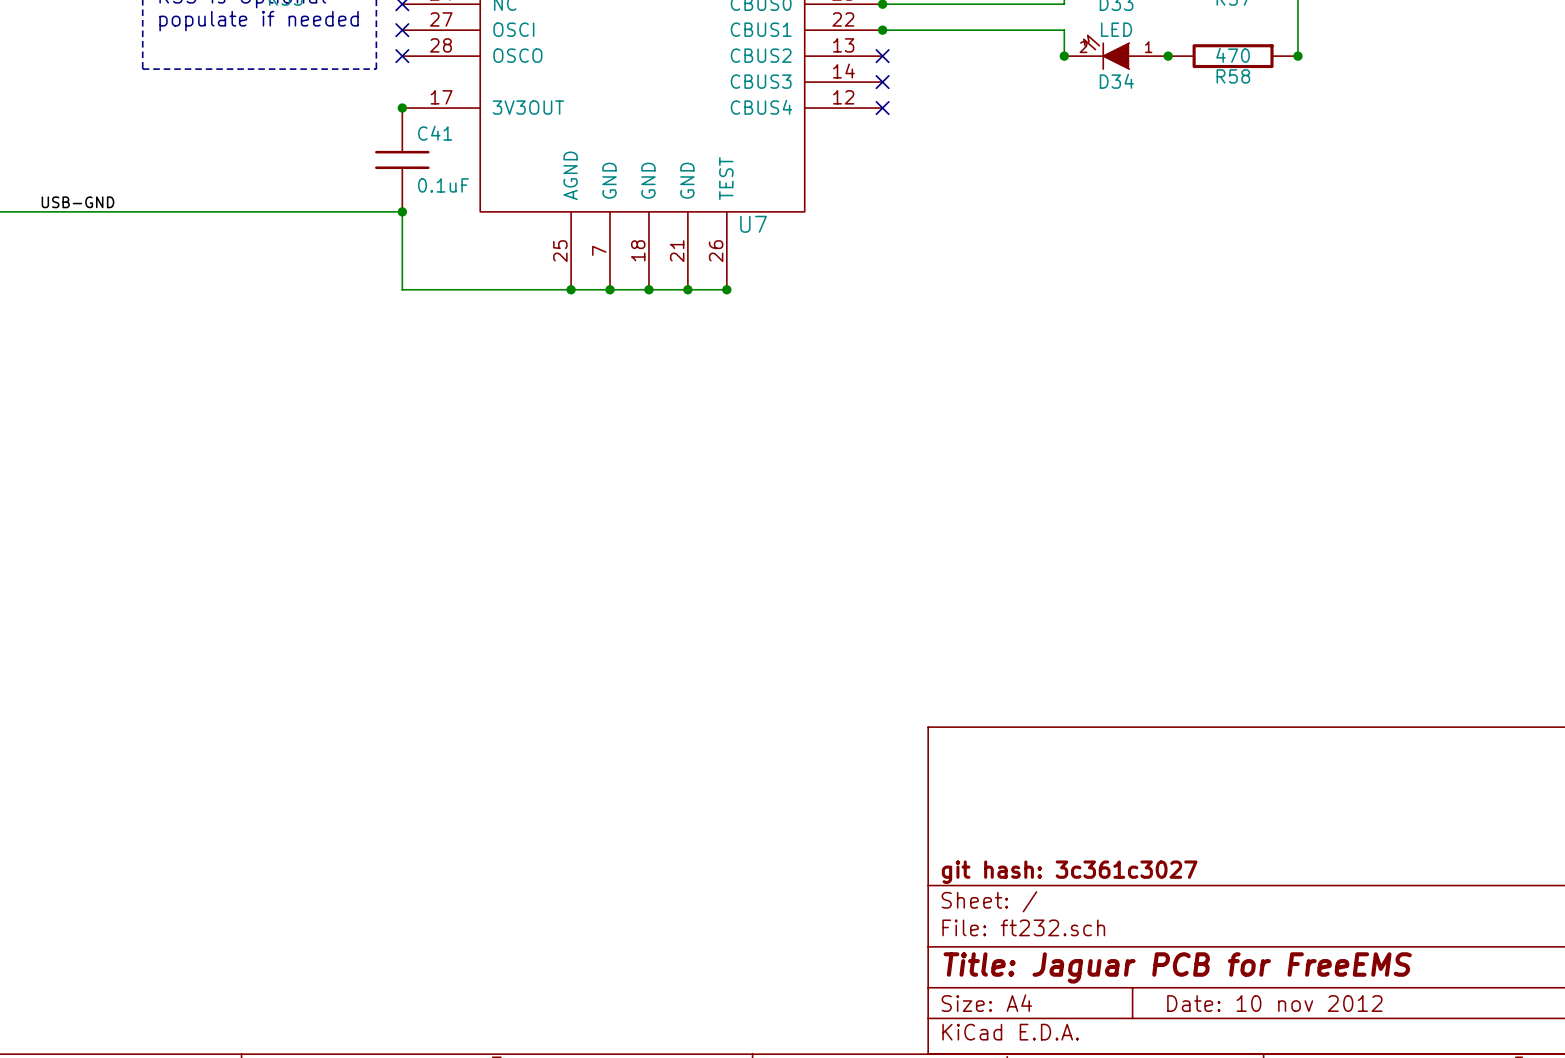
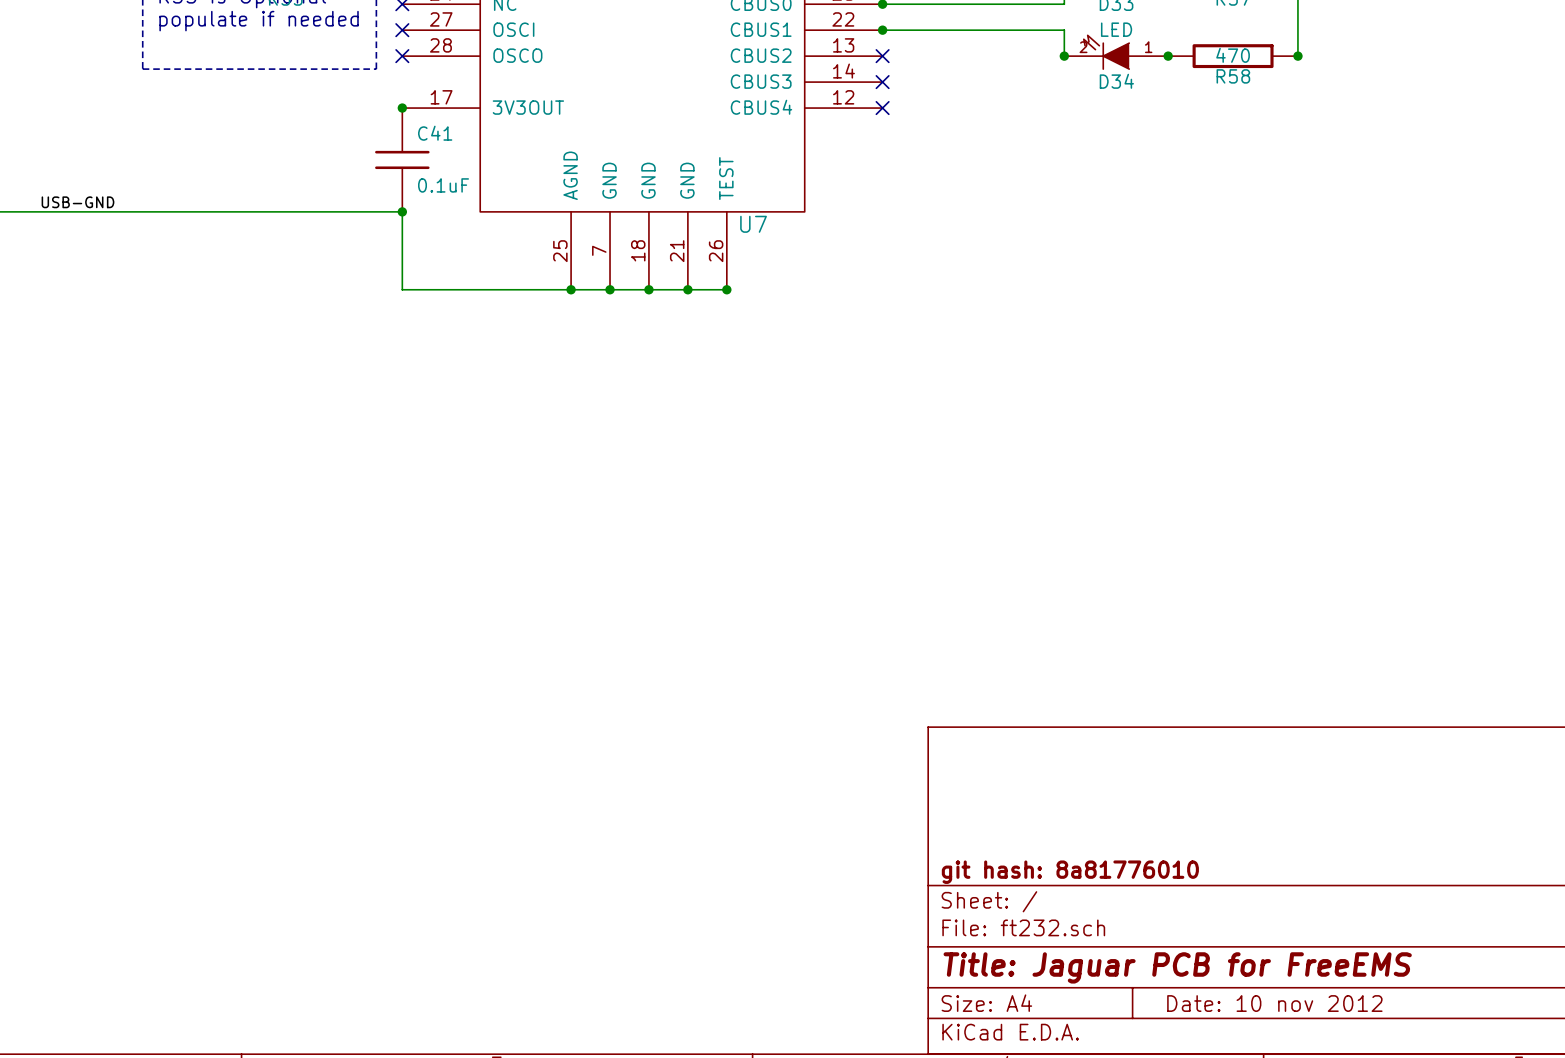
title block: git hash: 3c361c3027 (1069, 872) -> git hash: 8a81776010 (1070, 872)

